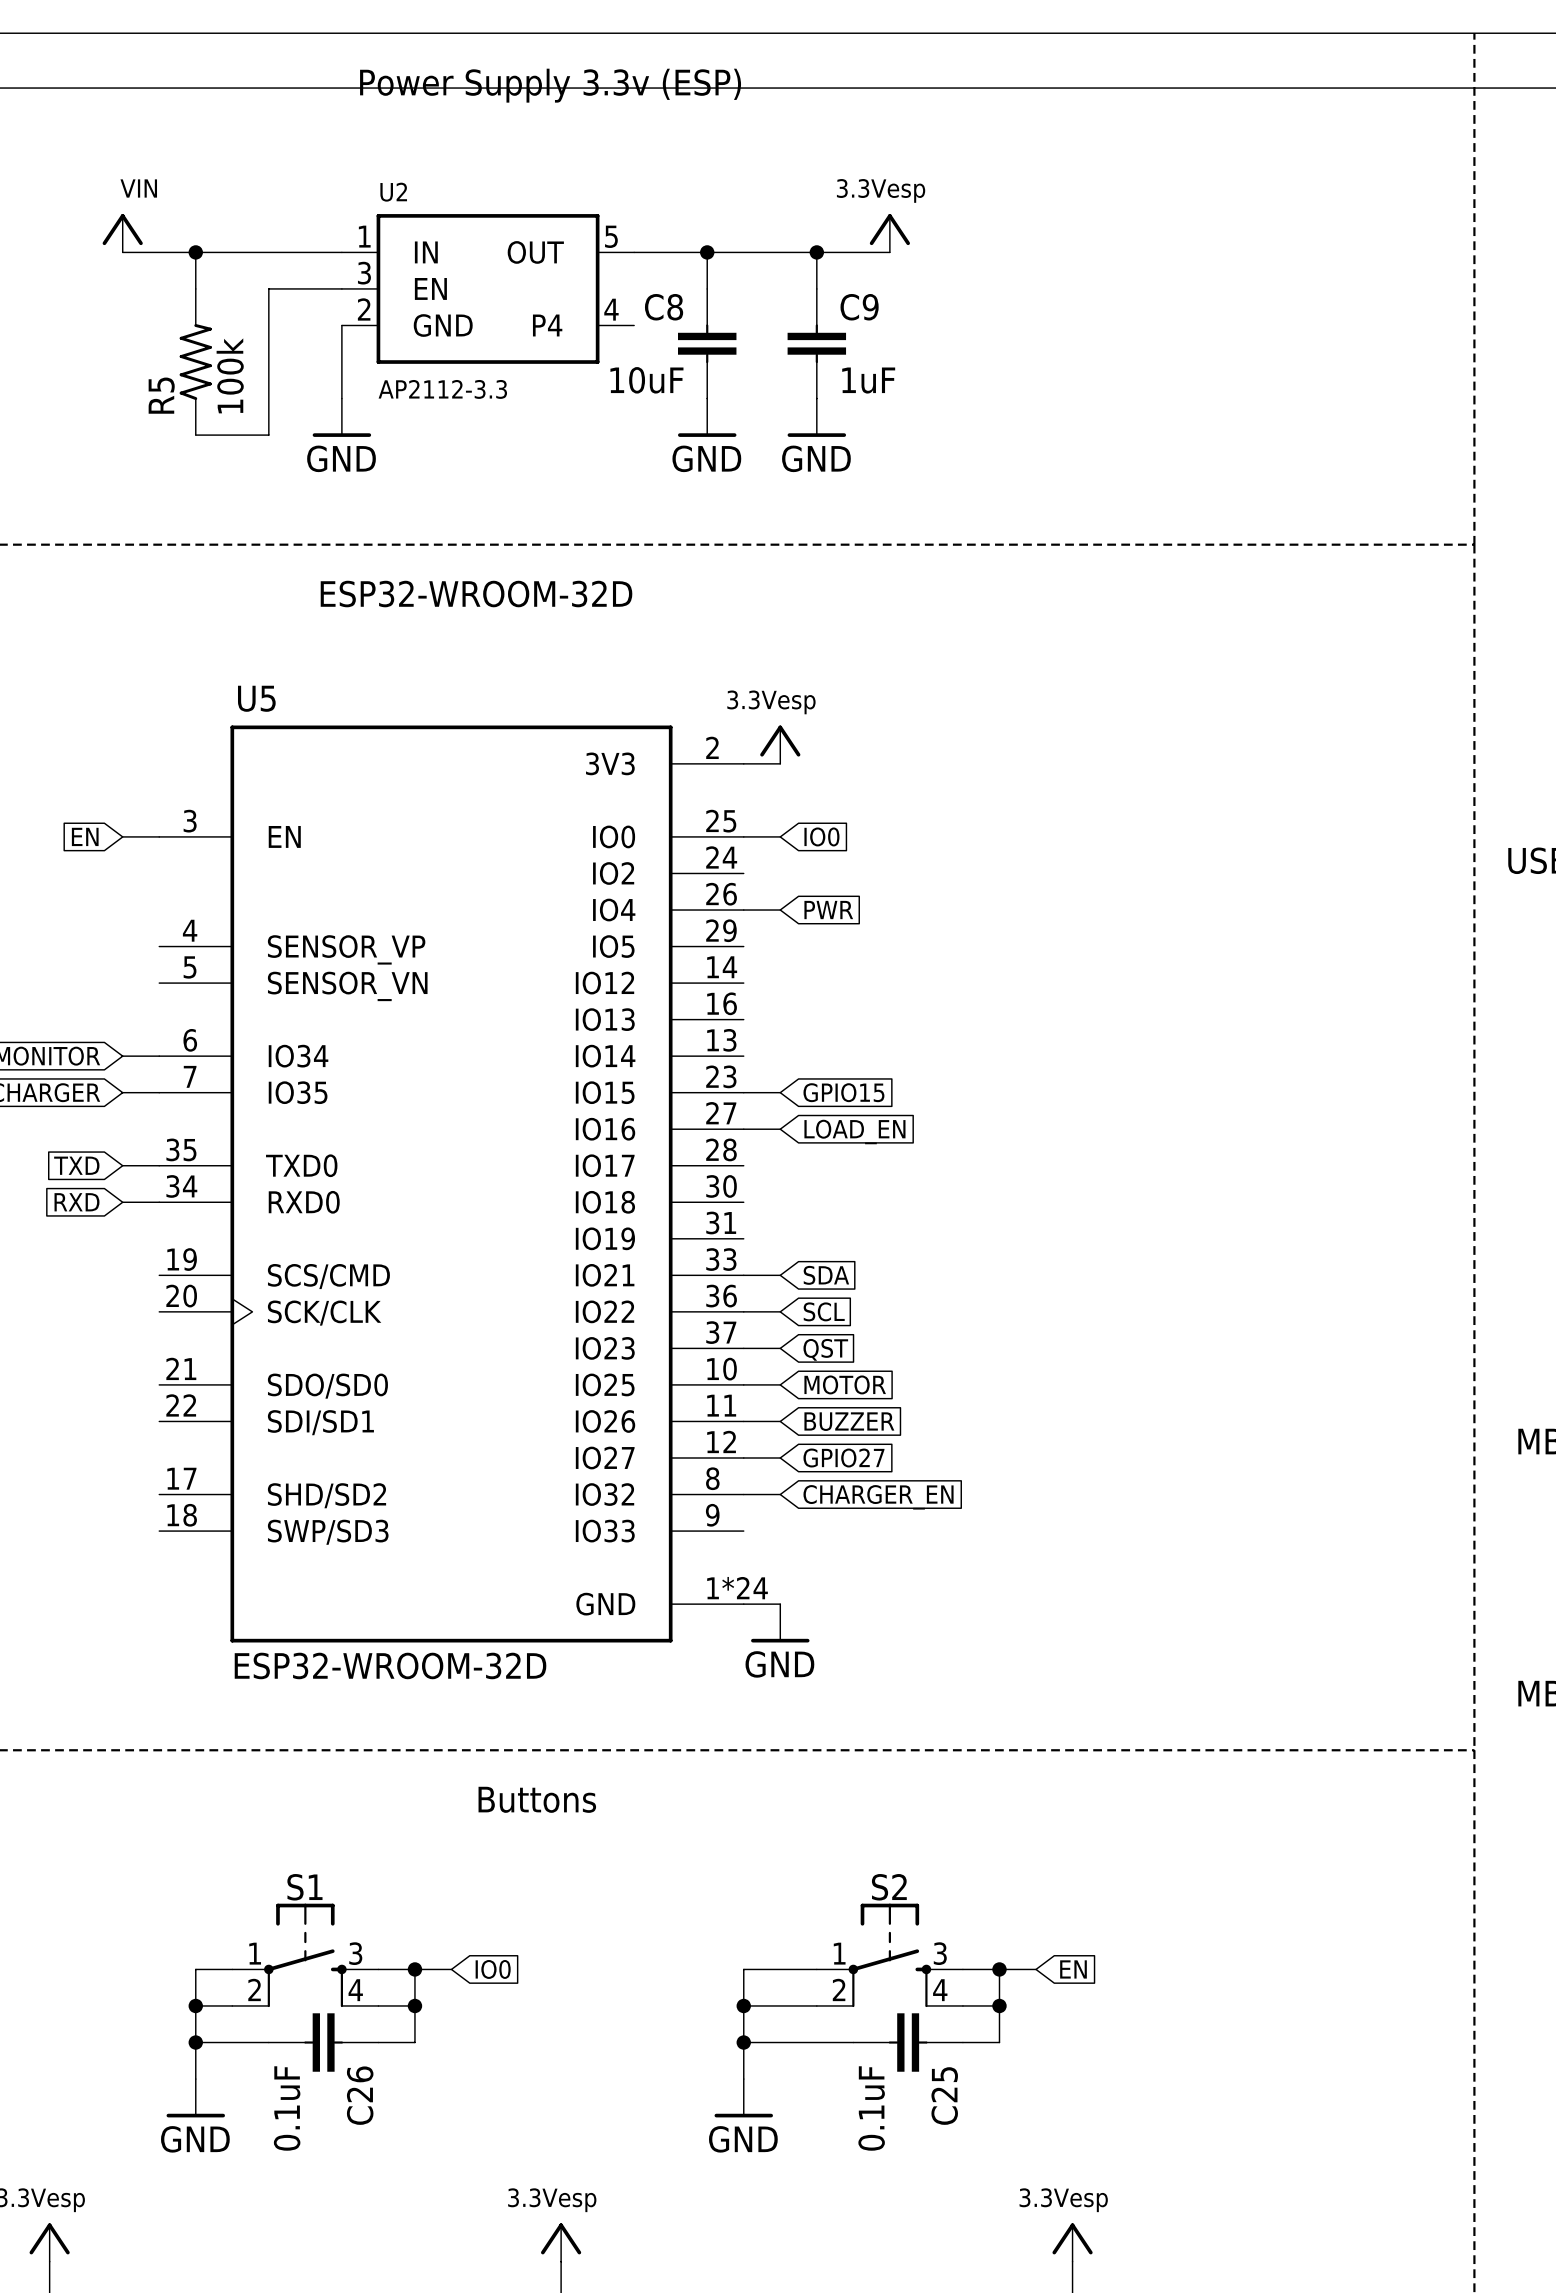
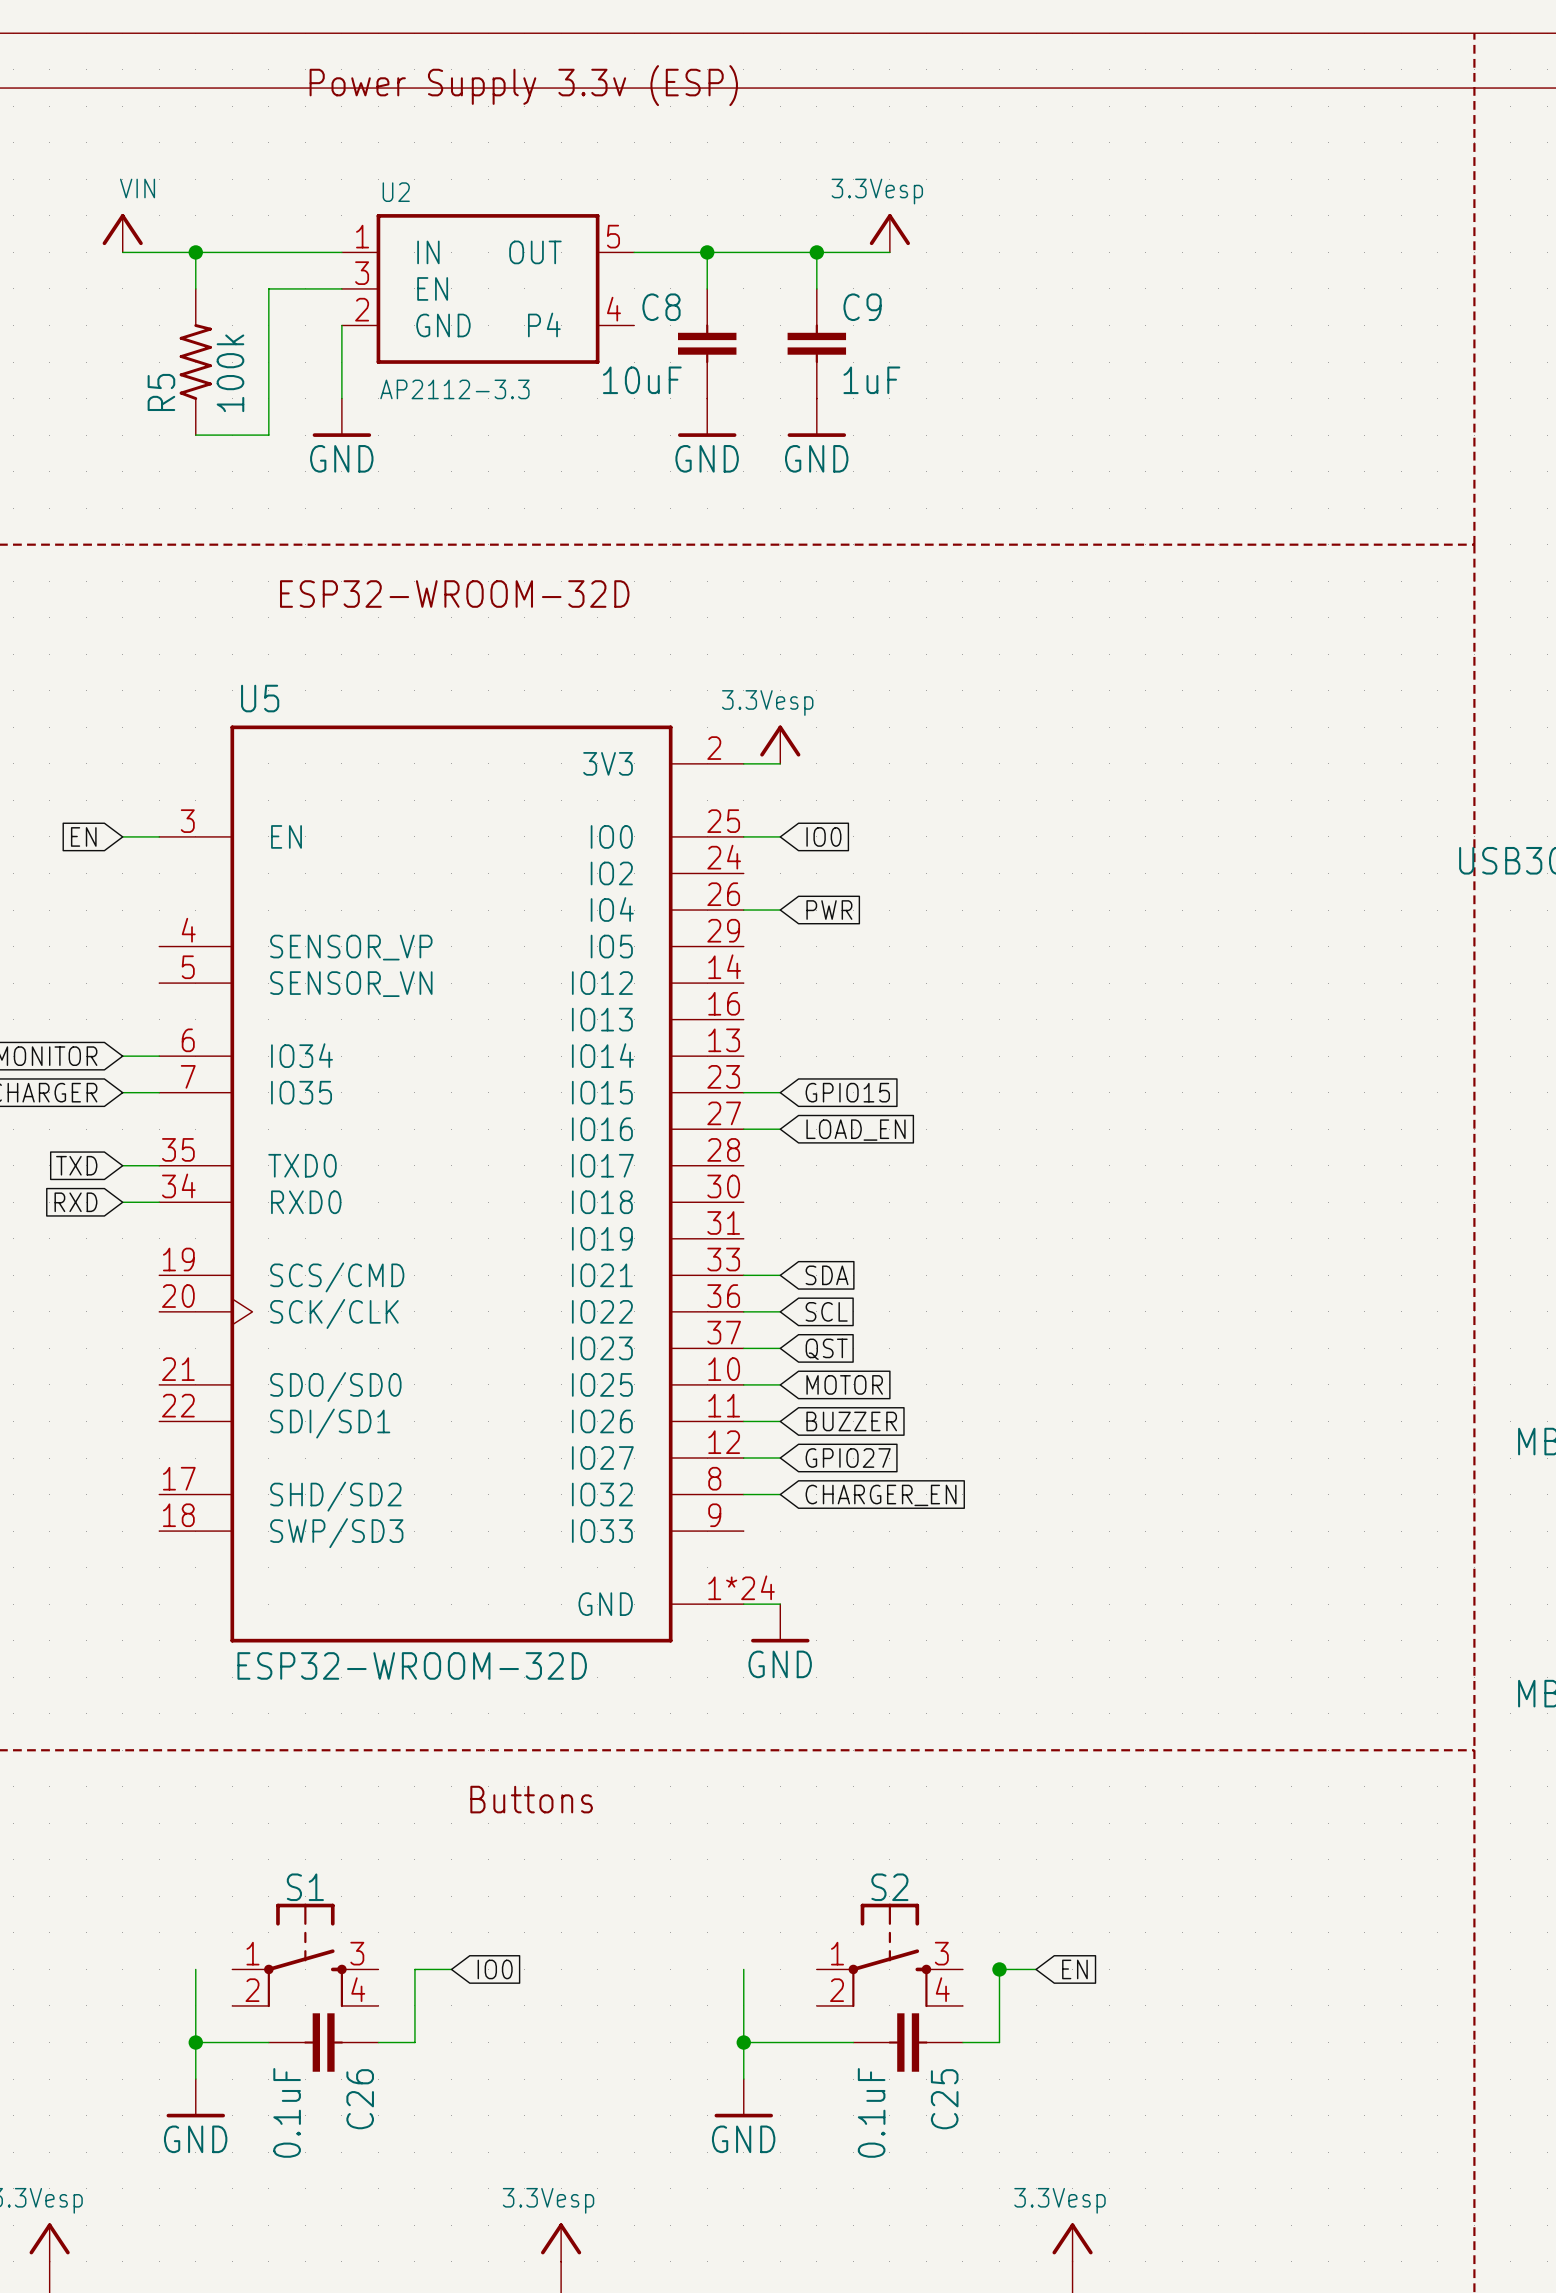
wire: (195, 1969) (232, 1969) -> none
wire: (378, 1969) (414, 1969) -> none
junction: (414, 1969) -> none
wire: (743, 1969) (816, 1969) -> none
wire: (962, 1969) (999, 1969) -> none
wire: (195, 2005) (232, 2005) -> none
junction: (195, 2005) -> none
wire: (378, 2005) (414, 2005) -> none
junction: (414, 2005) -> none
wire: (743, 2005) (816, 2005) -> none
junction: (743, 2005) -> none
wire: (962, 2005) (999, 2005) -> none
junction: (999, 2005) -> none

